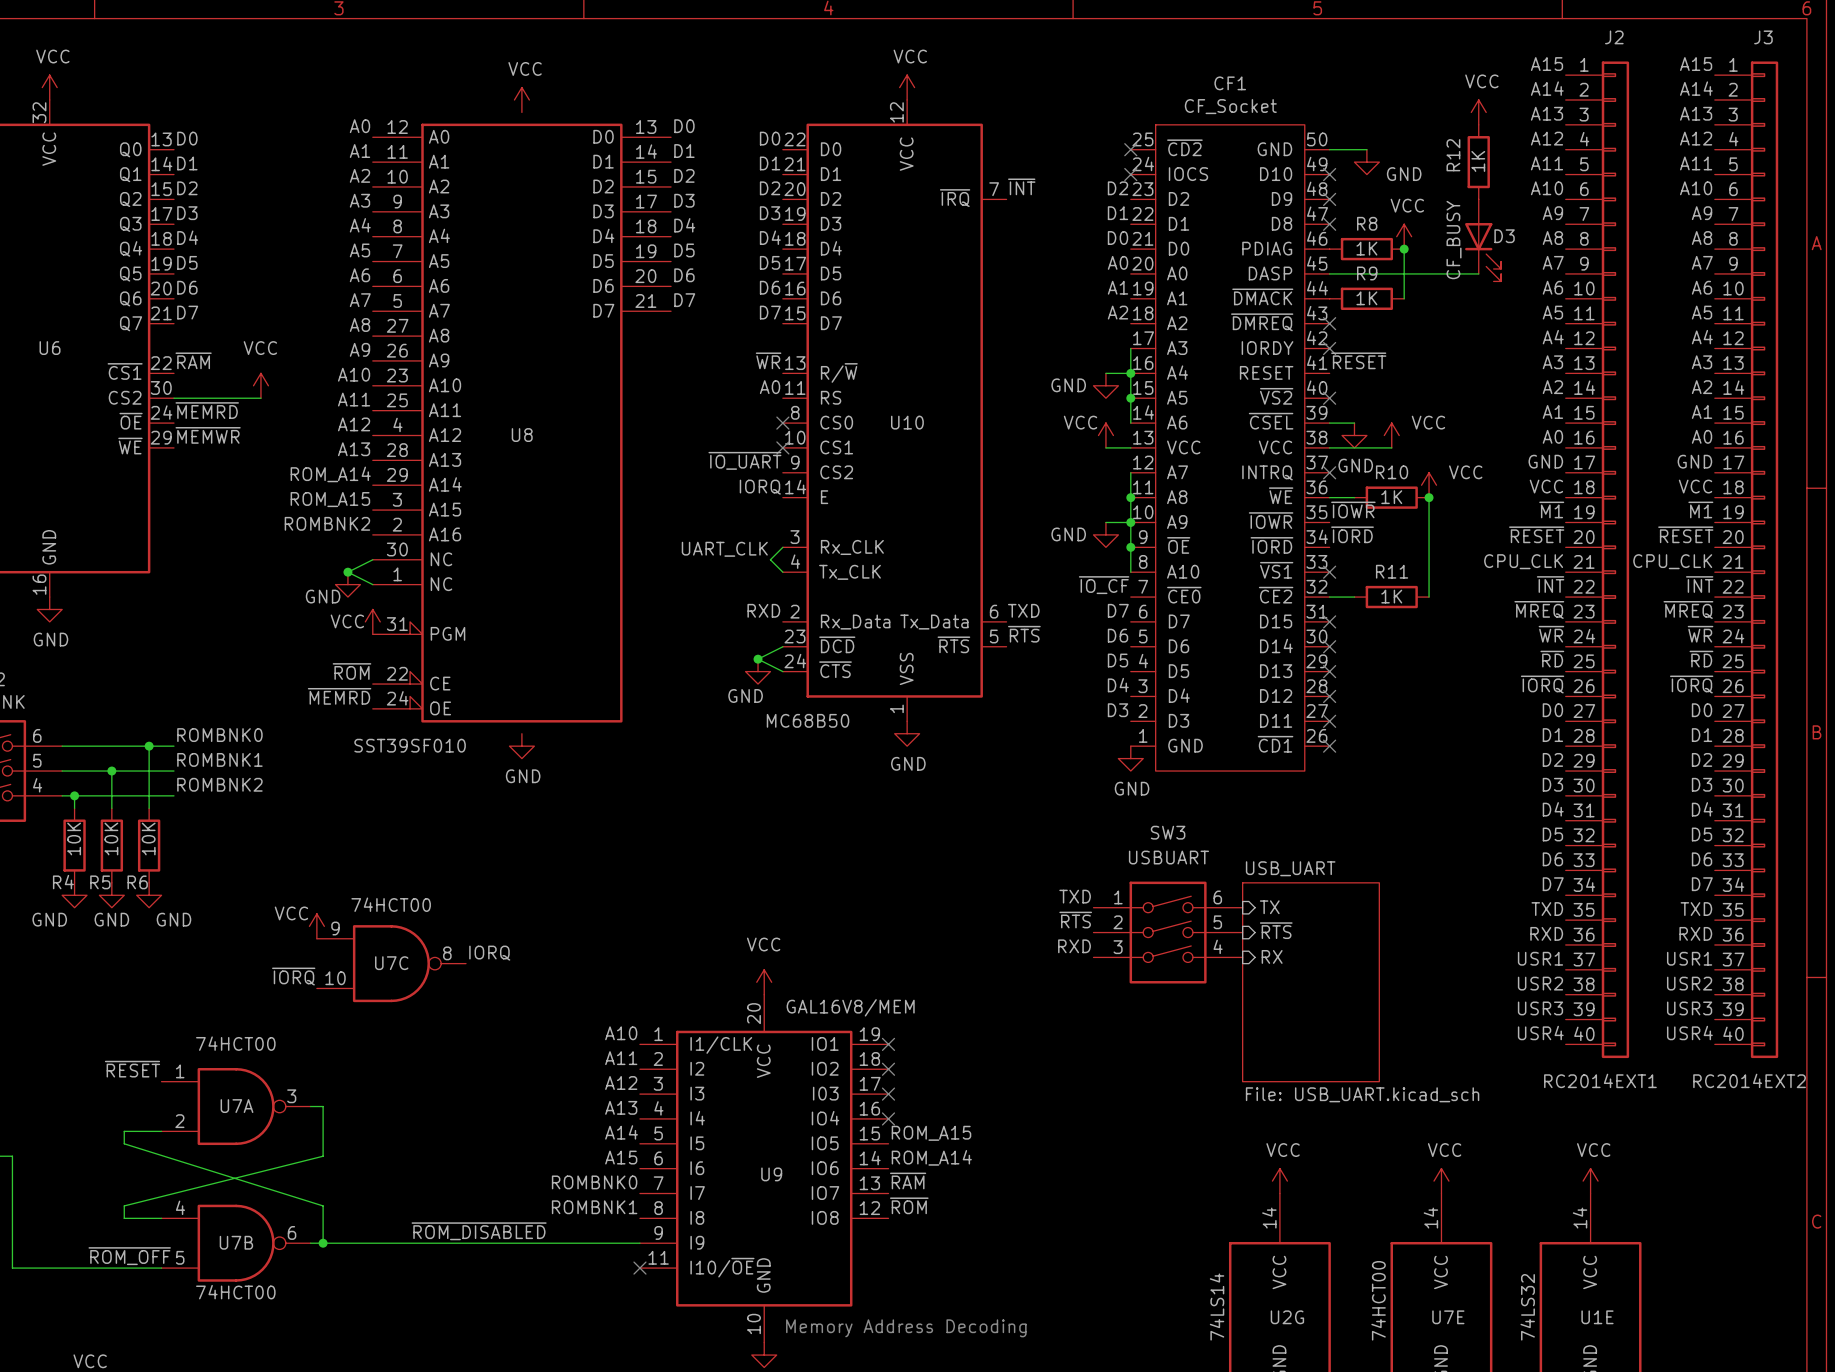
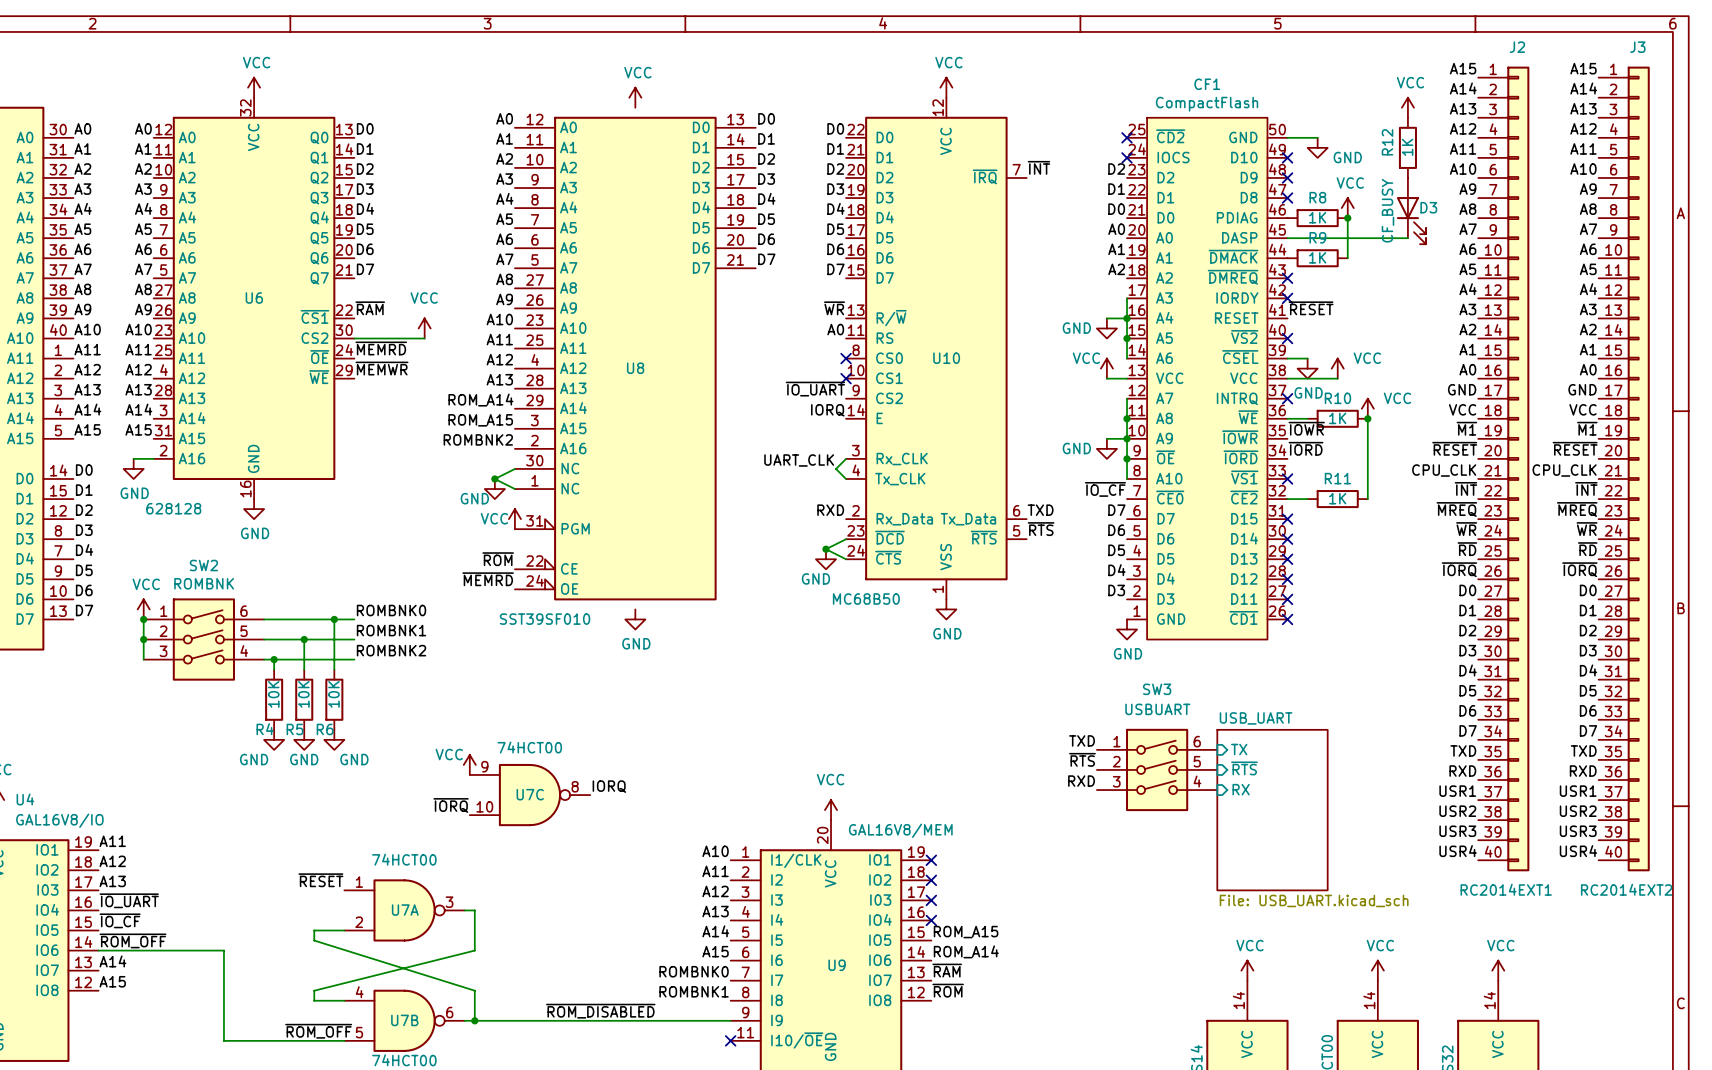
CF1 value: CF_Socket (1230, 106) -> CompactFlash (1207, 104)

